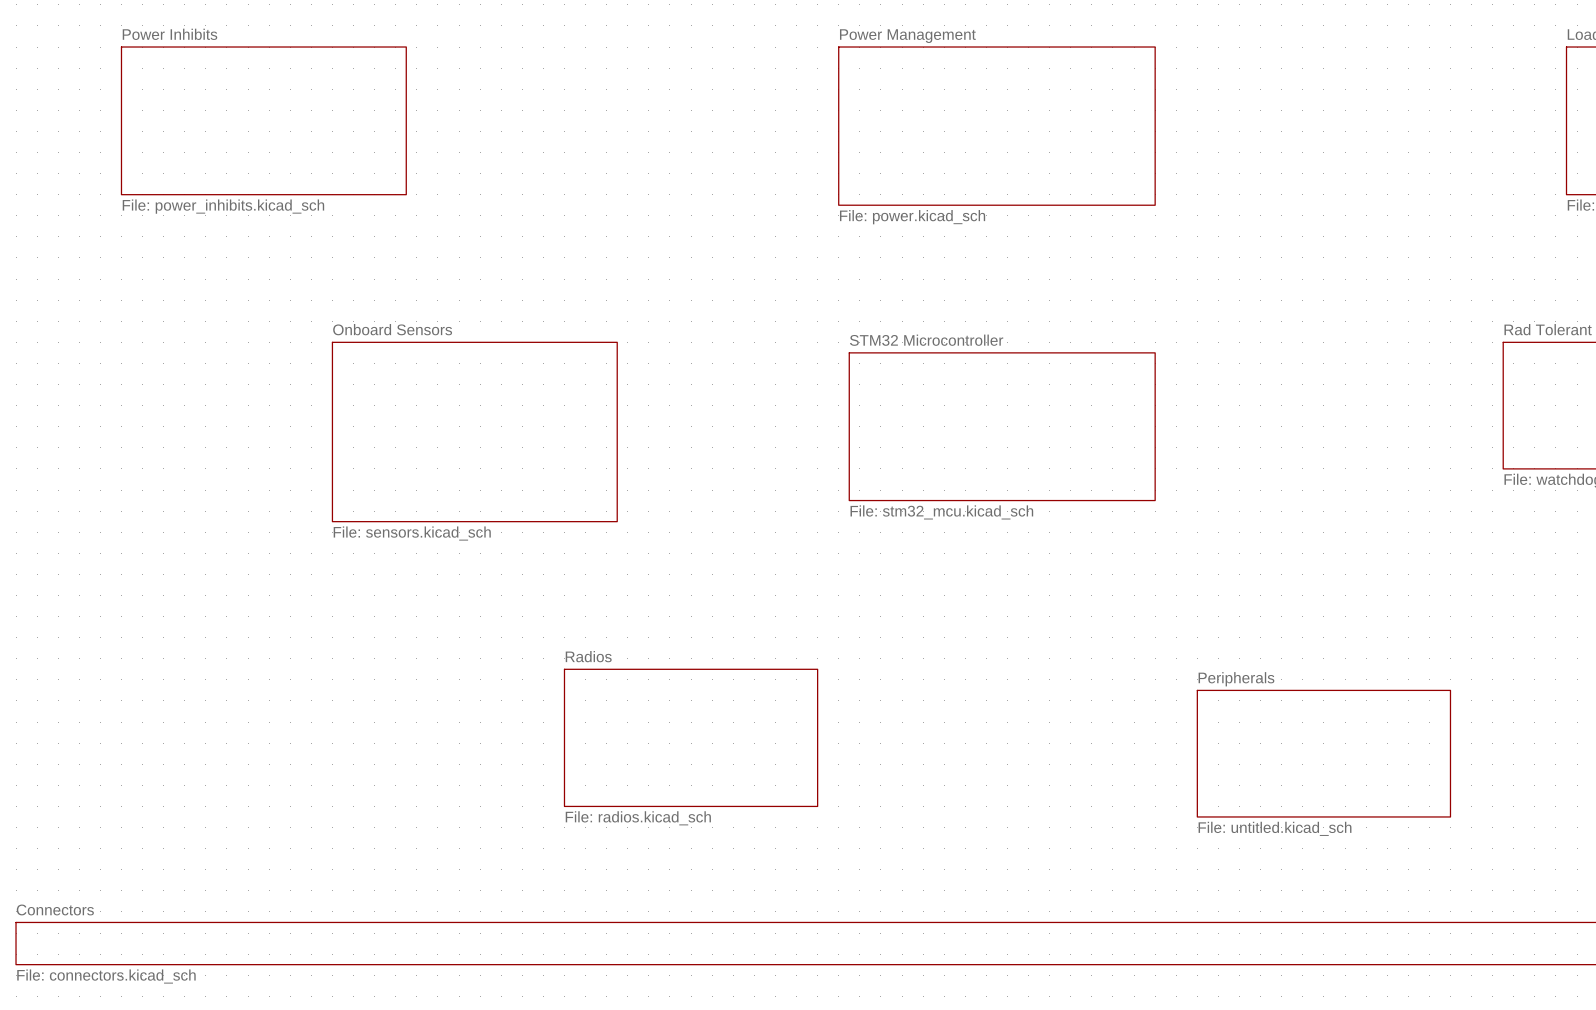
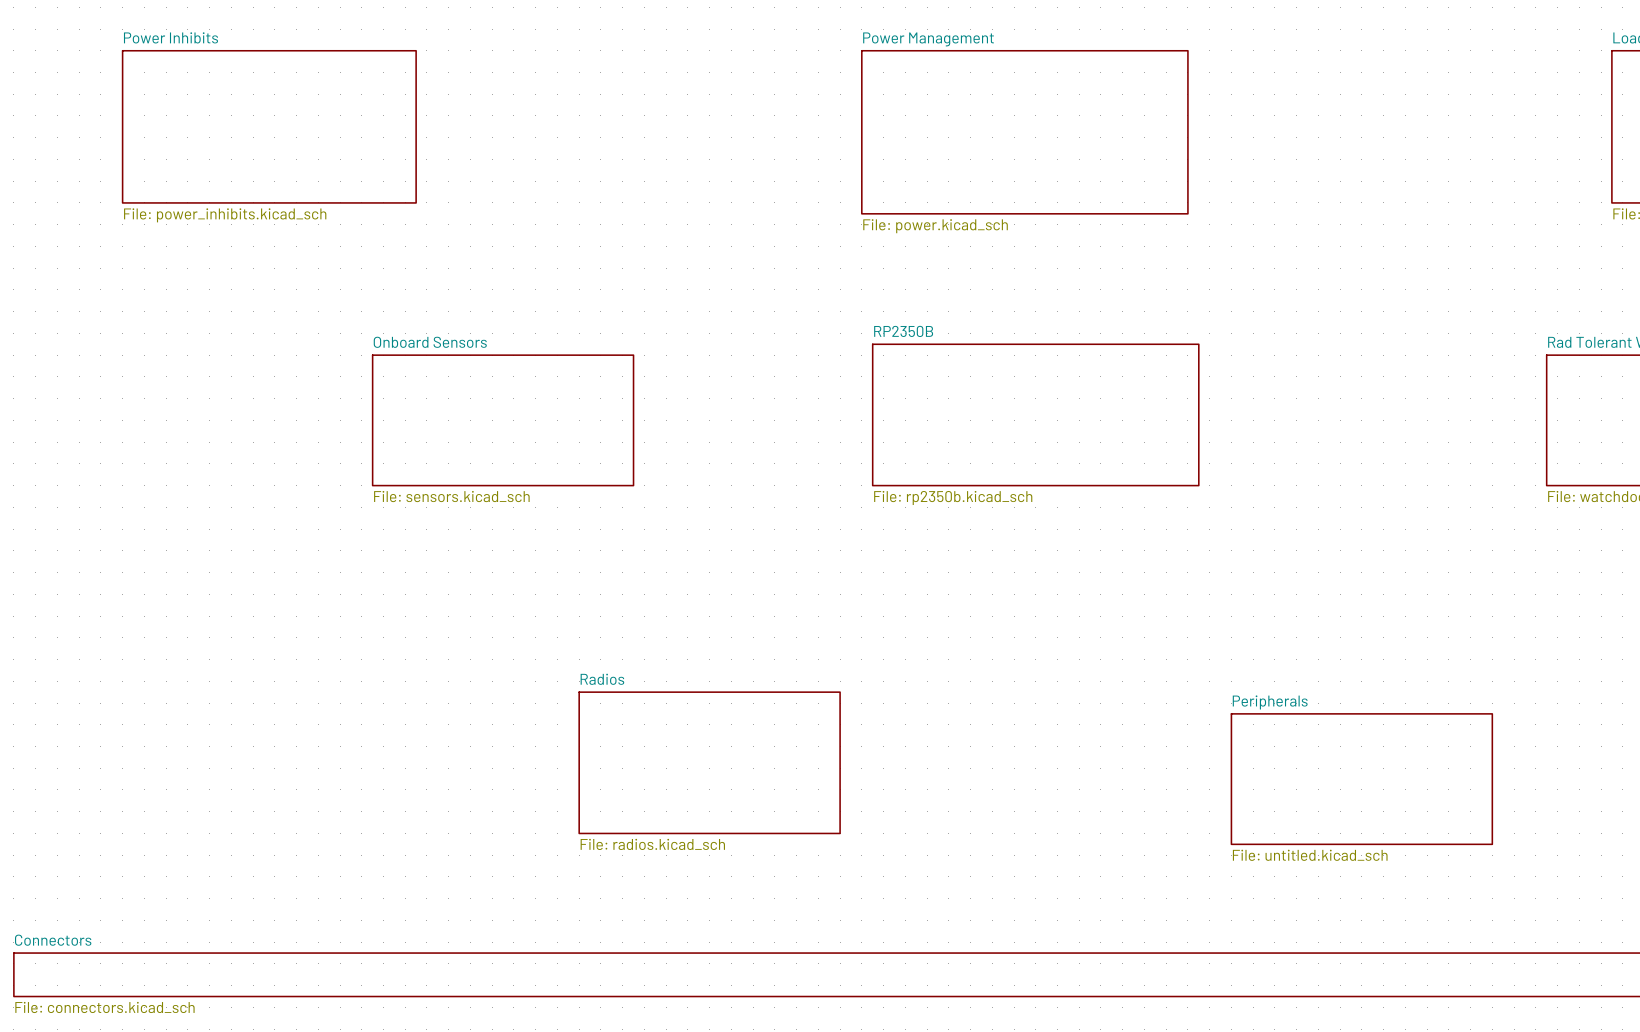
sheet RP2350B: none -> File: rp2350b.kicad_sch (1035, 414)
sheet Onboard Sensors: none -> File: sensors.kicad_sch (503, 420)
sheet STM32 Microcontroller: File: stm32_mcu.kicad_sch (1002, 426) -> none
sheet Onboard Sensors: File: sensors.kicad_sch (474, 431) -> none

